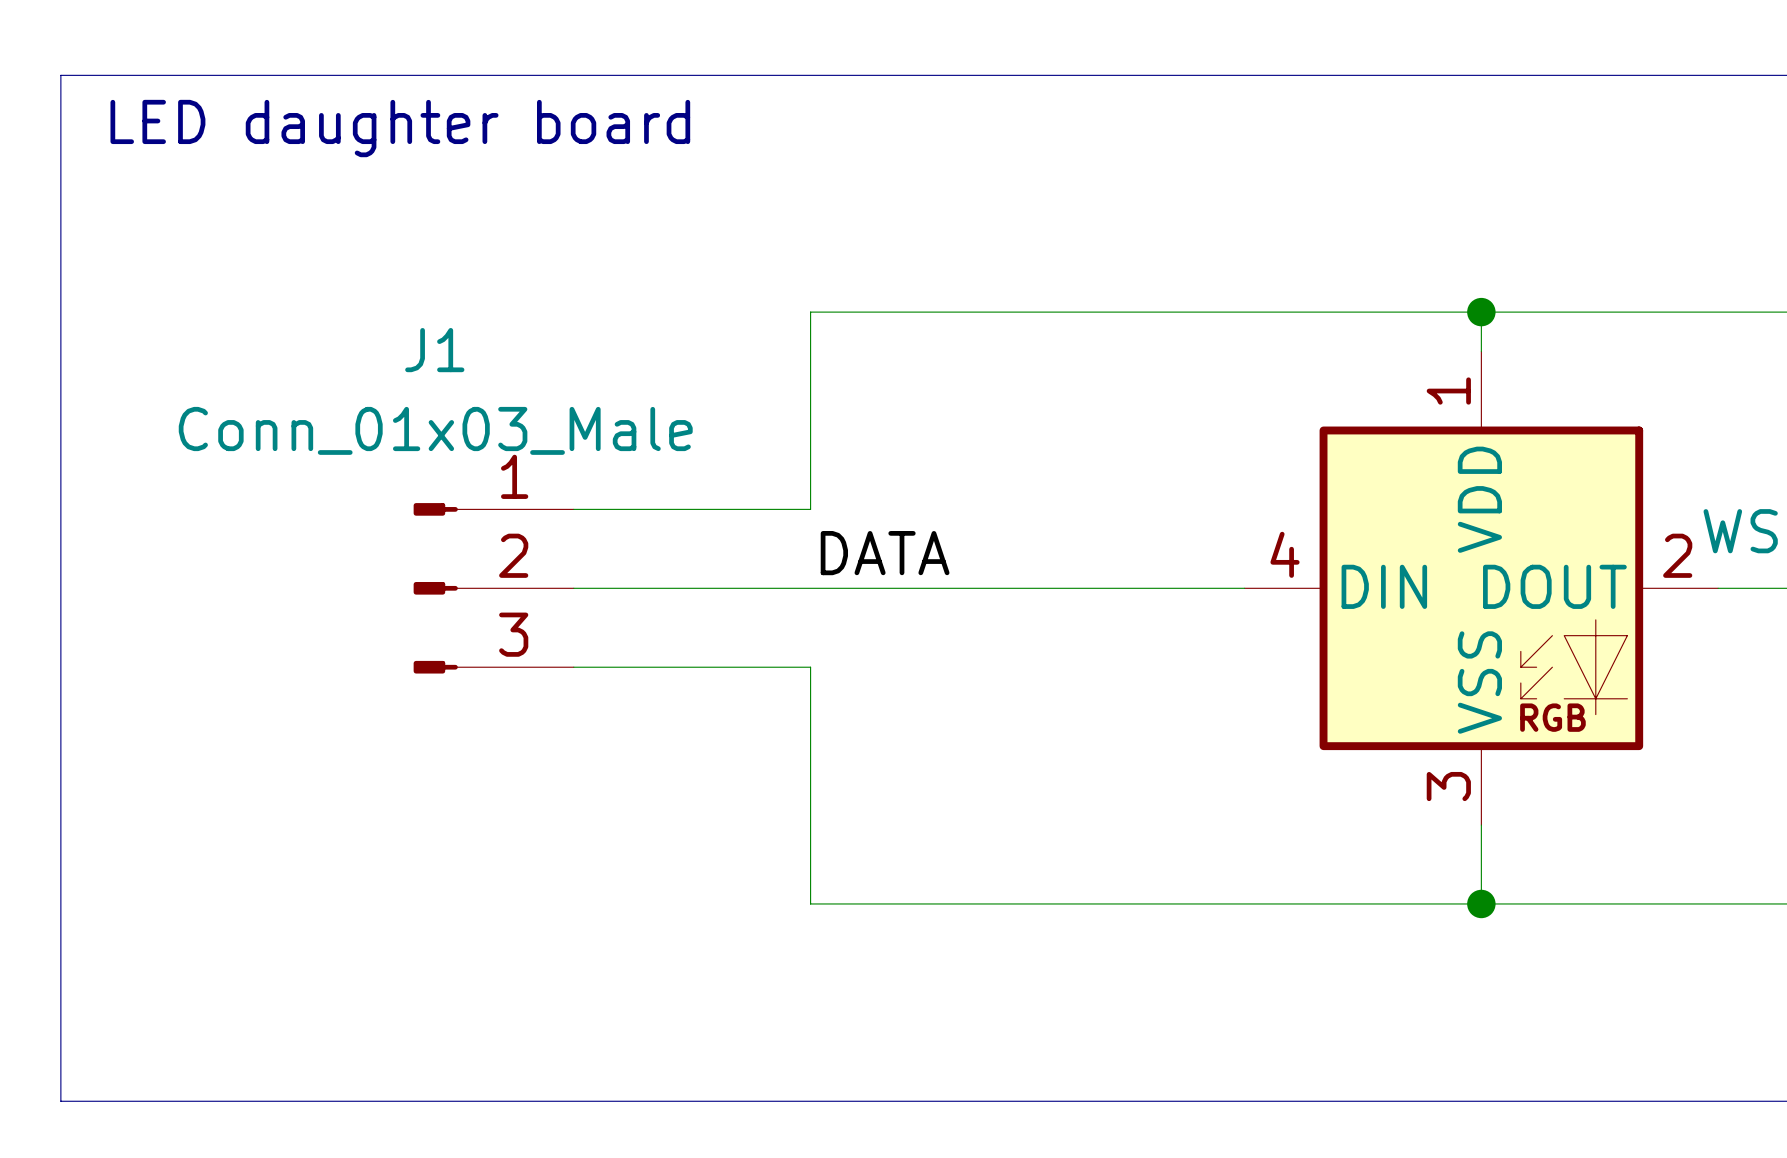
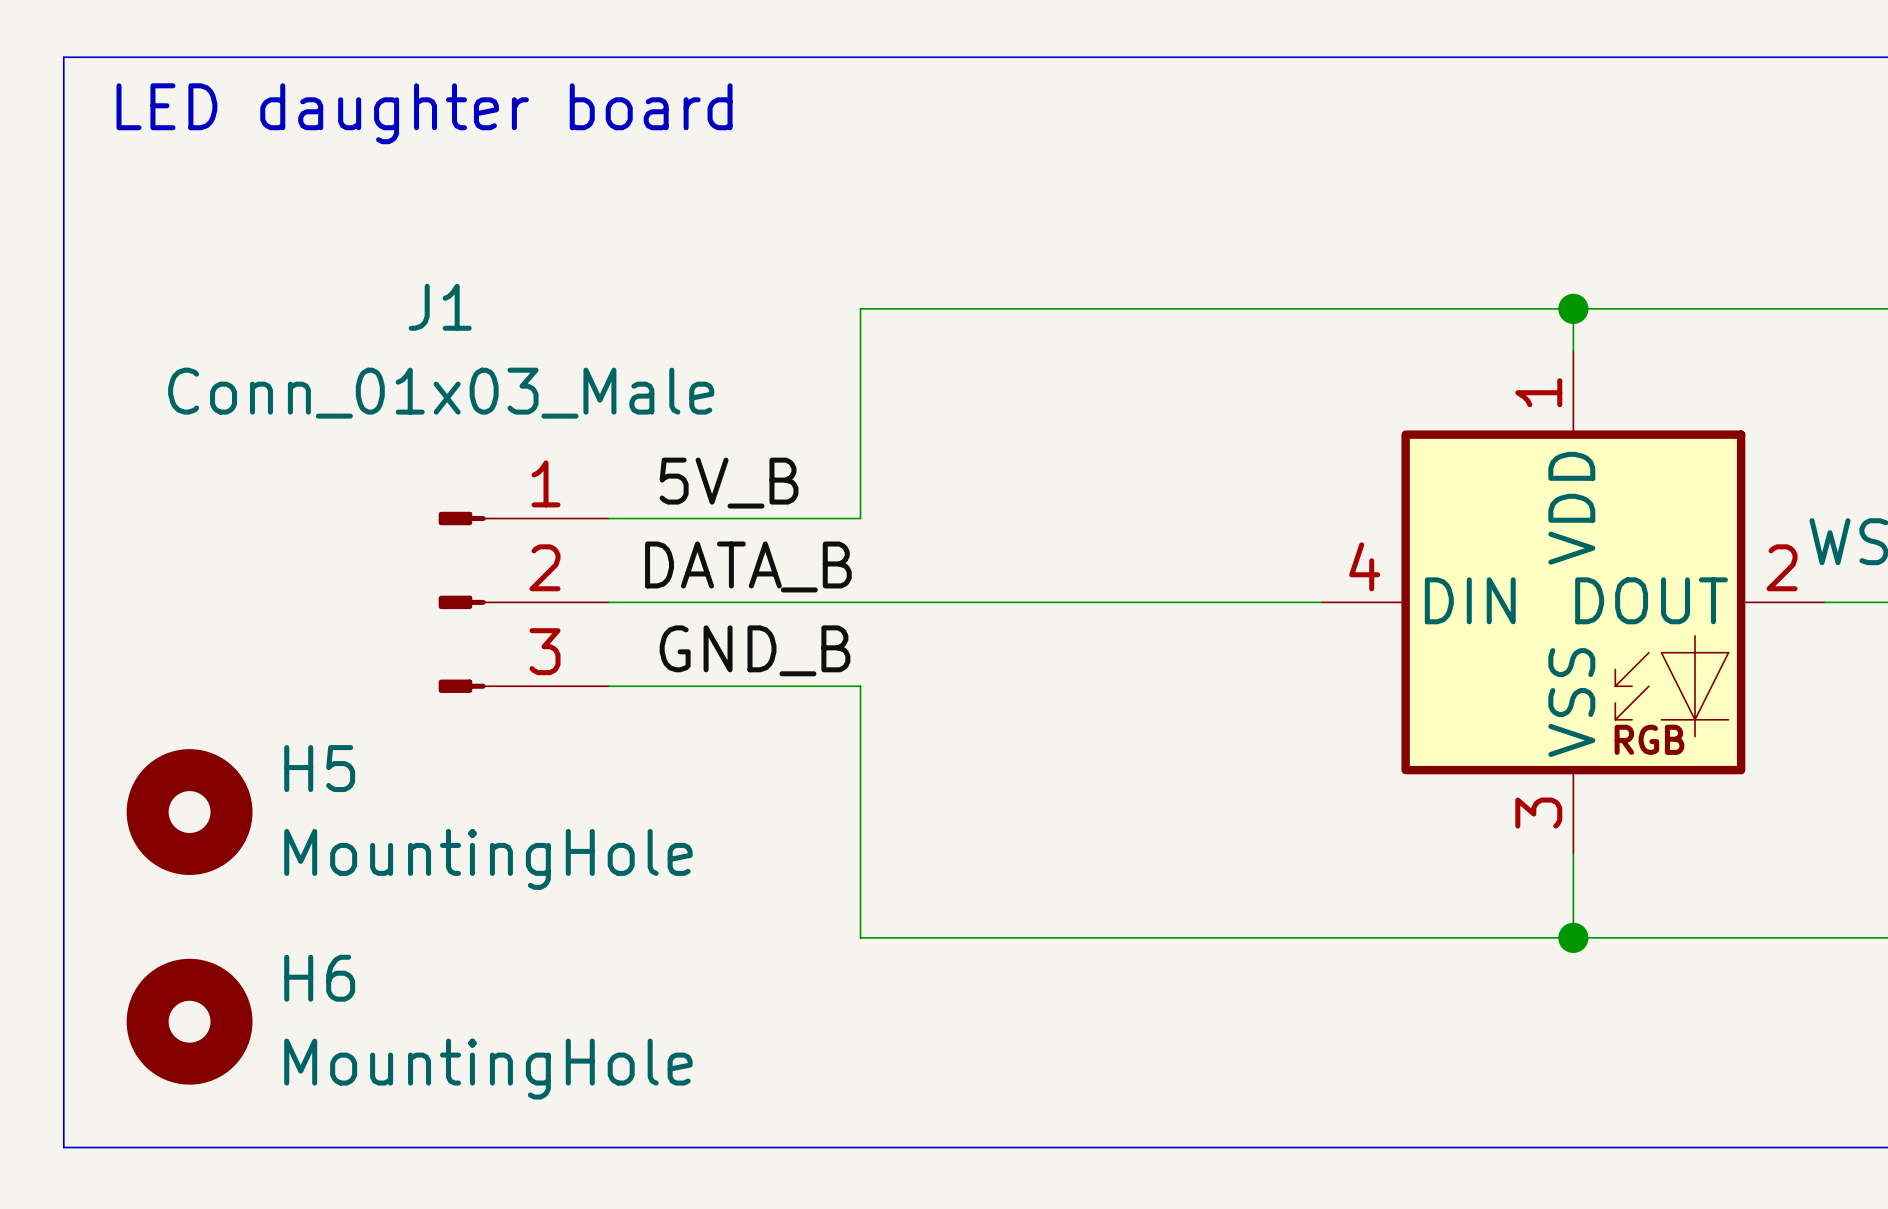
J1 name position: J1 (434, 350) -> J1 (440, 307)
J1 value position: Conn_01x03_Male (435, 430) -> Conn_01x03_Male (441, 393)
label: none -> 5V_B (729, 483)
label: DATA (885, 553) -> DATA_B (748, 566)
label: none -> GND_B (755, 650)
H5: none -> MountingHole (189, 812)
H6: none -> MountingHole (189, 1021)

